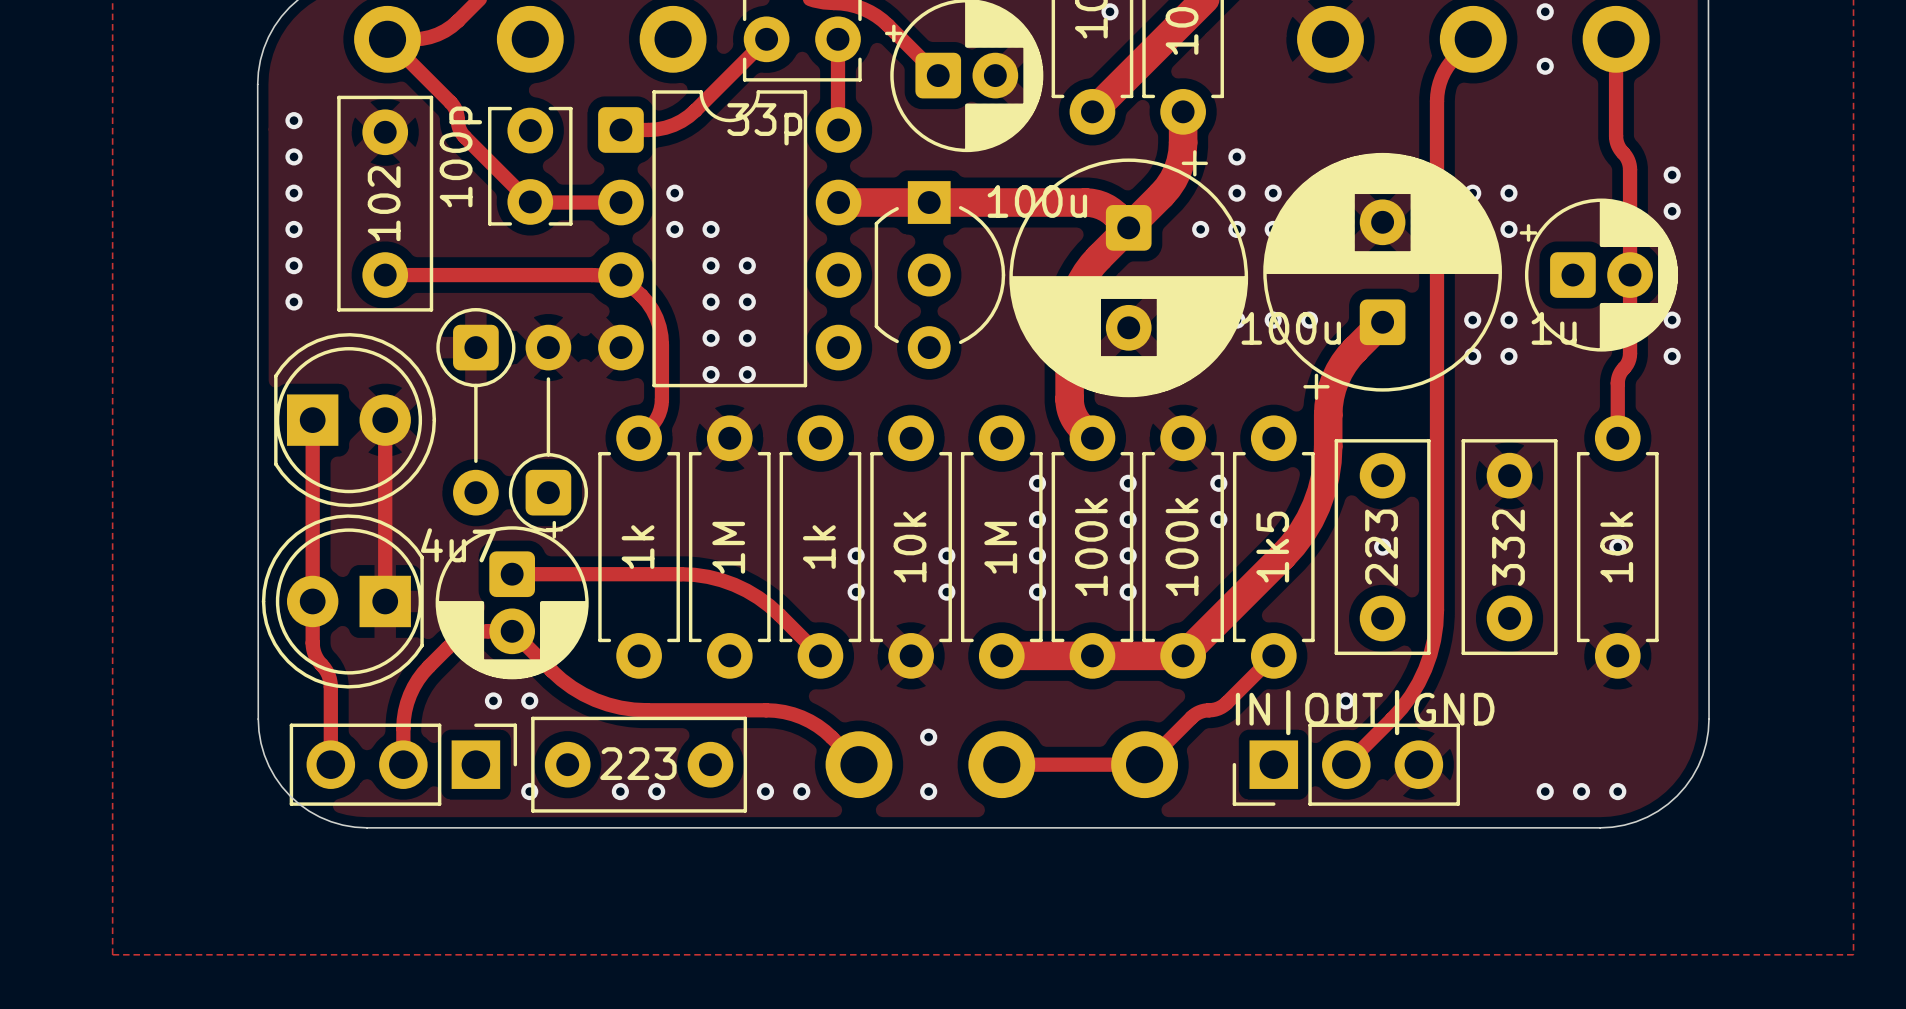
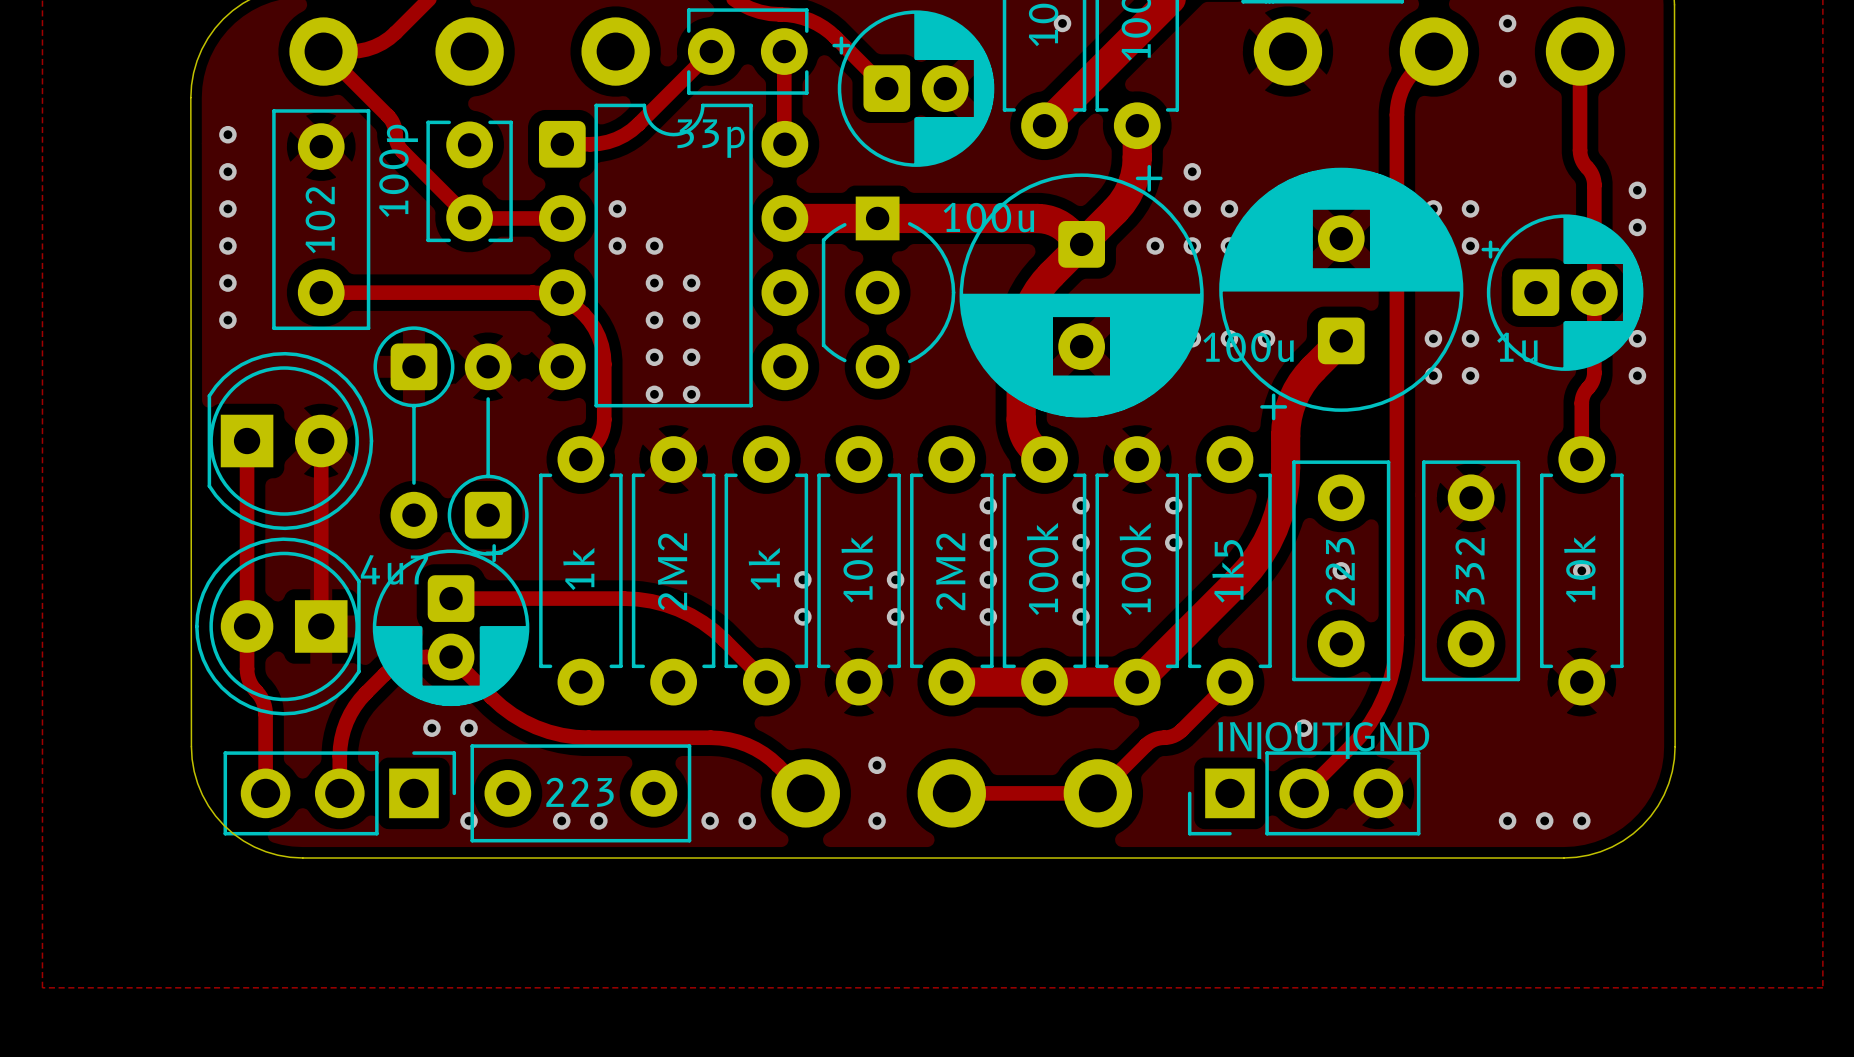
part value: 1M (728, 547) -> 2M2 (672, 571)
part value: 1M (1000, 547) -> 2M2 (950, 571)

